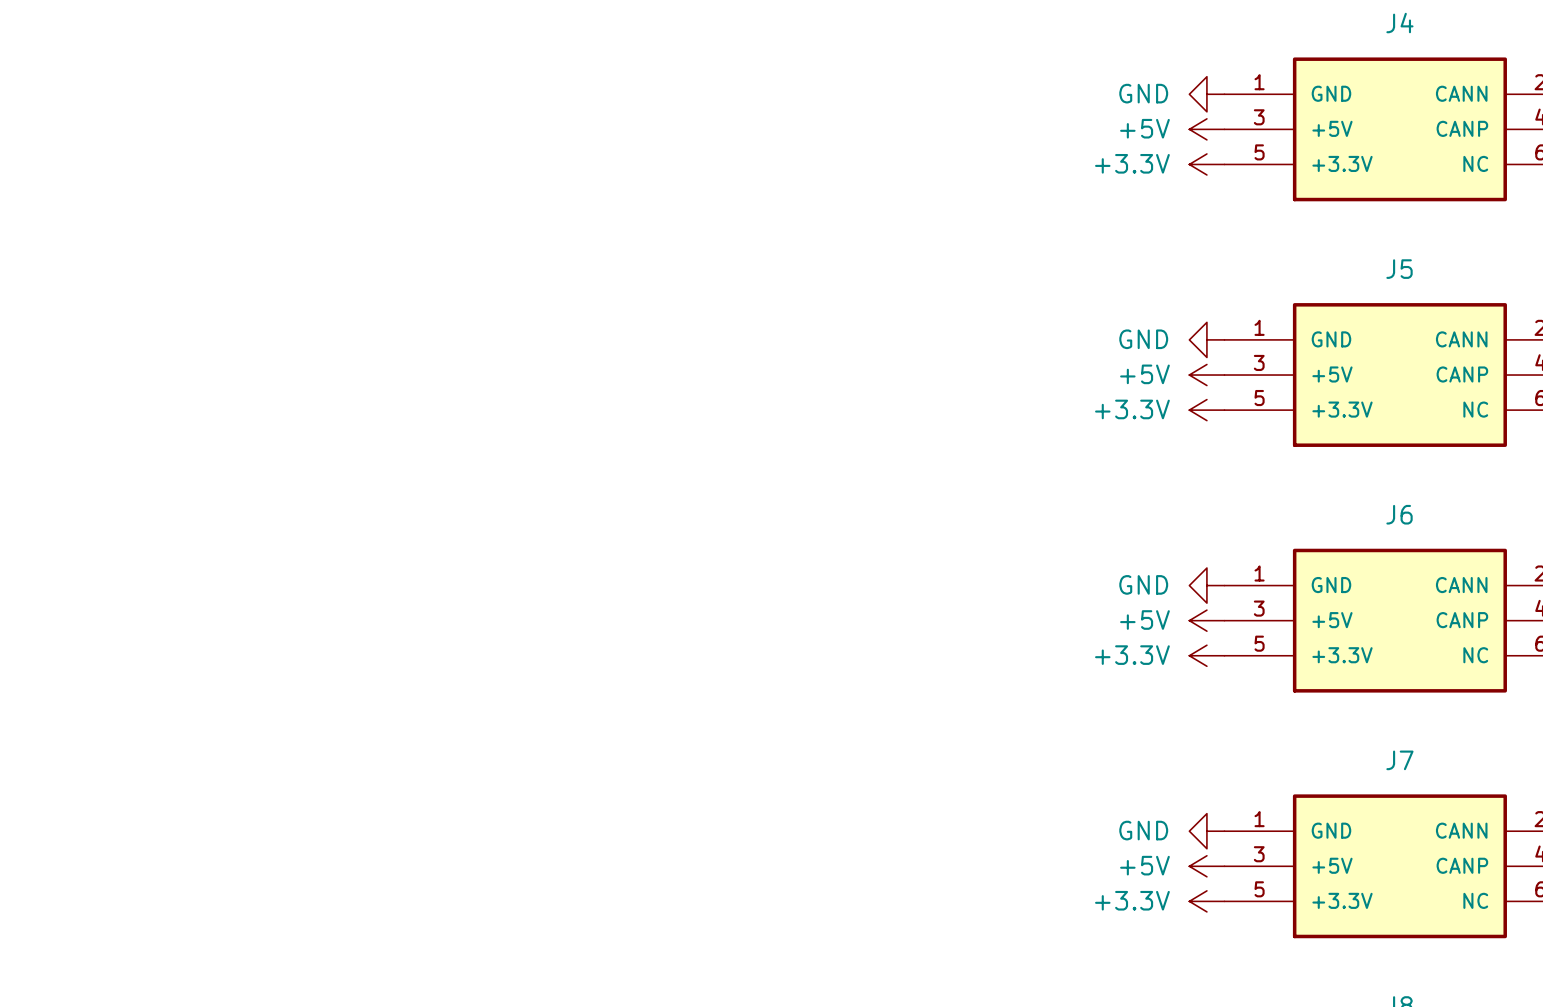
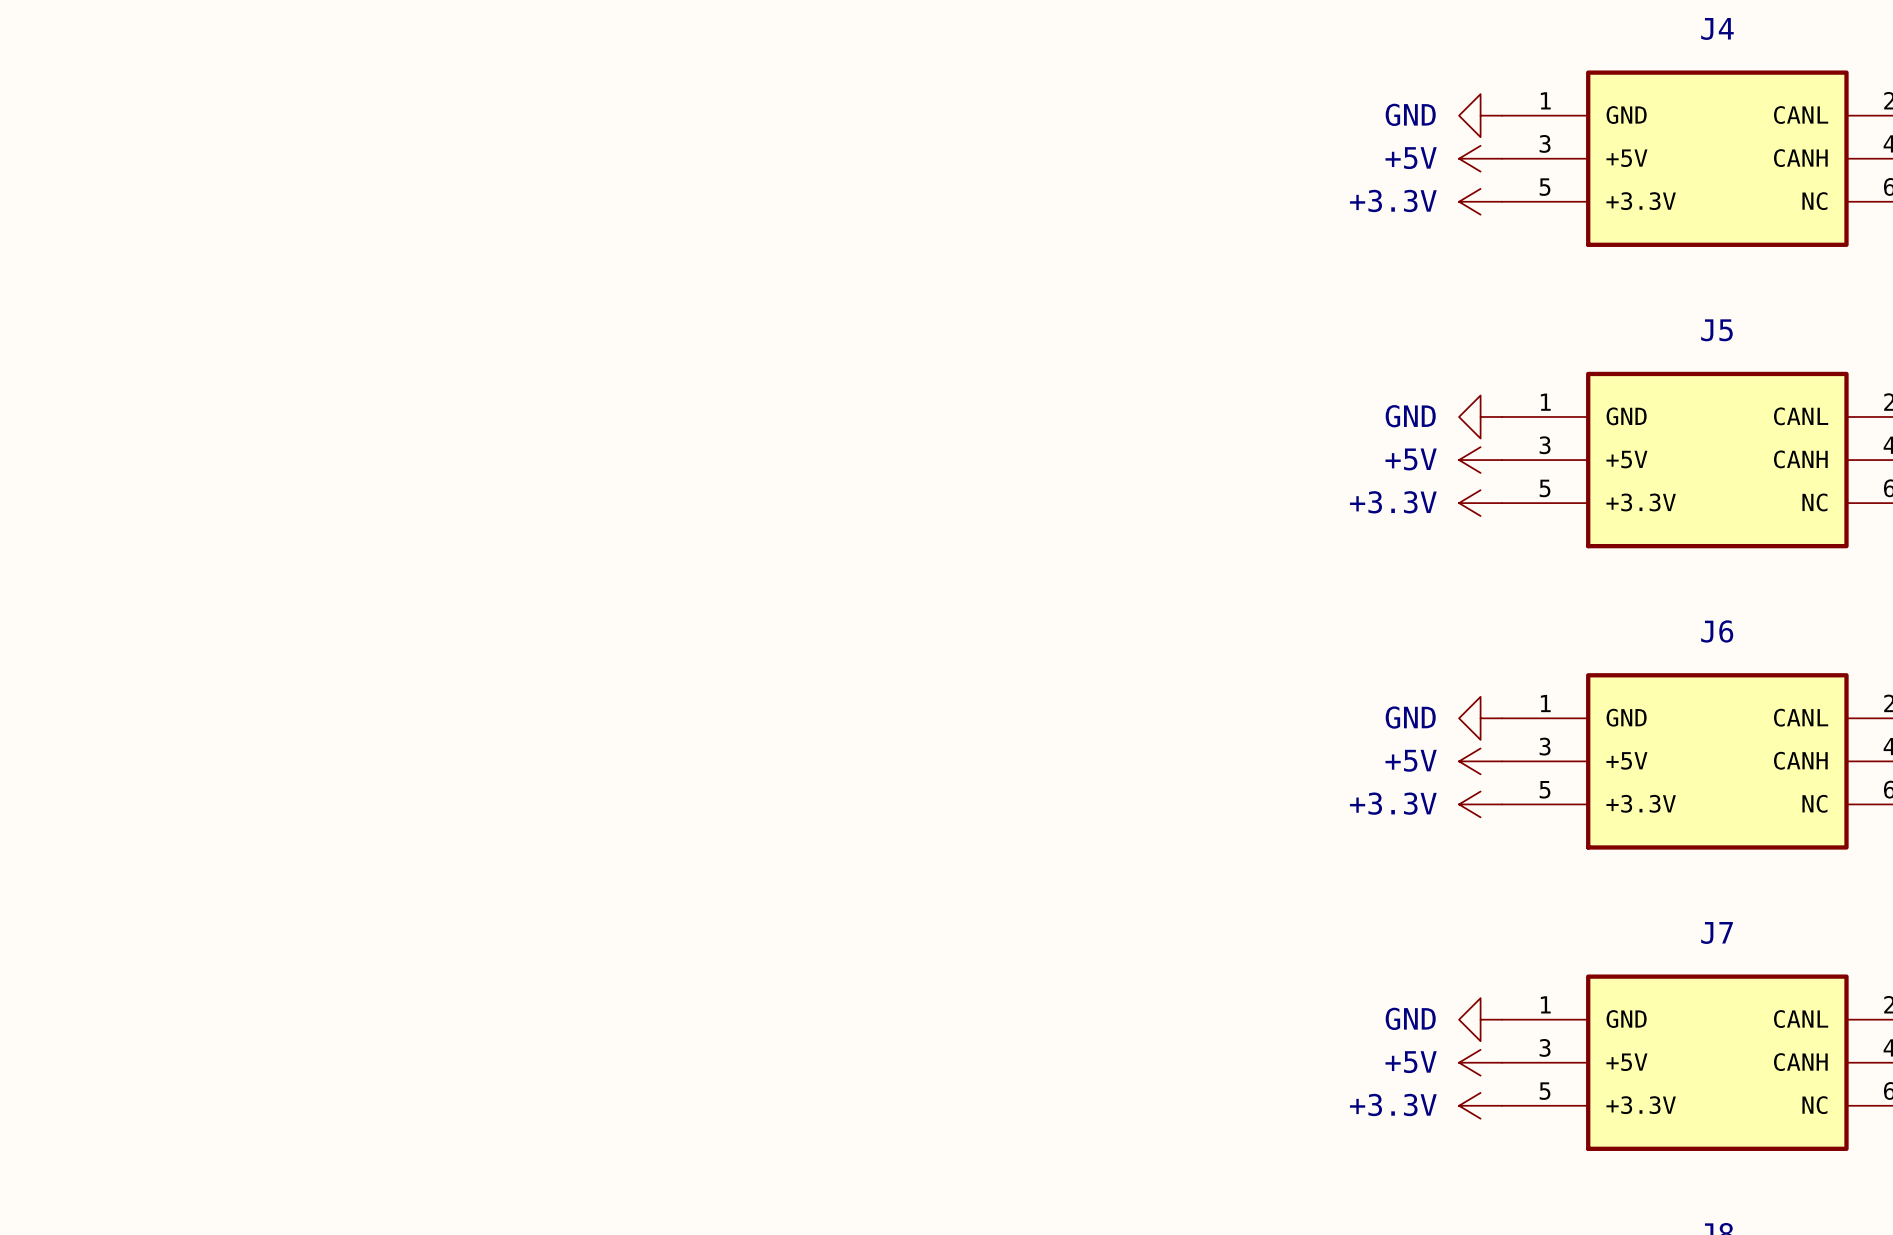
J4 pin name: CANN (1461, 93) -> CANL (1801, 115)
J4 pin name: CANP (1462, 128) -> CANH (1800, 158)
J5 pin name: CANN (1461, 339) -> CANL (1801, 416)
J5 pin name: CANP (1462, 374) -> CANH (1800, 459)
J6 pin name: CANN (1461, 585) -> CANL (1801, 717)
J6 pin name: CANP (1462, 620) -> CANH (1800, 760)
J7 pin name: CANN (1461, 830) -> CANL (1801, 1019)
J7 pin name: CANP (1462, 865) -> CANH (1800, 1062)

